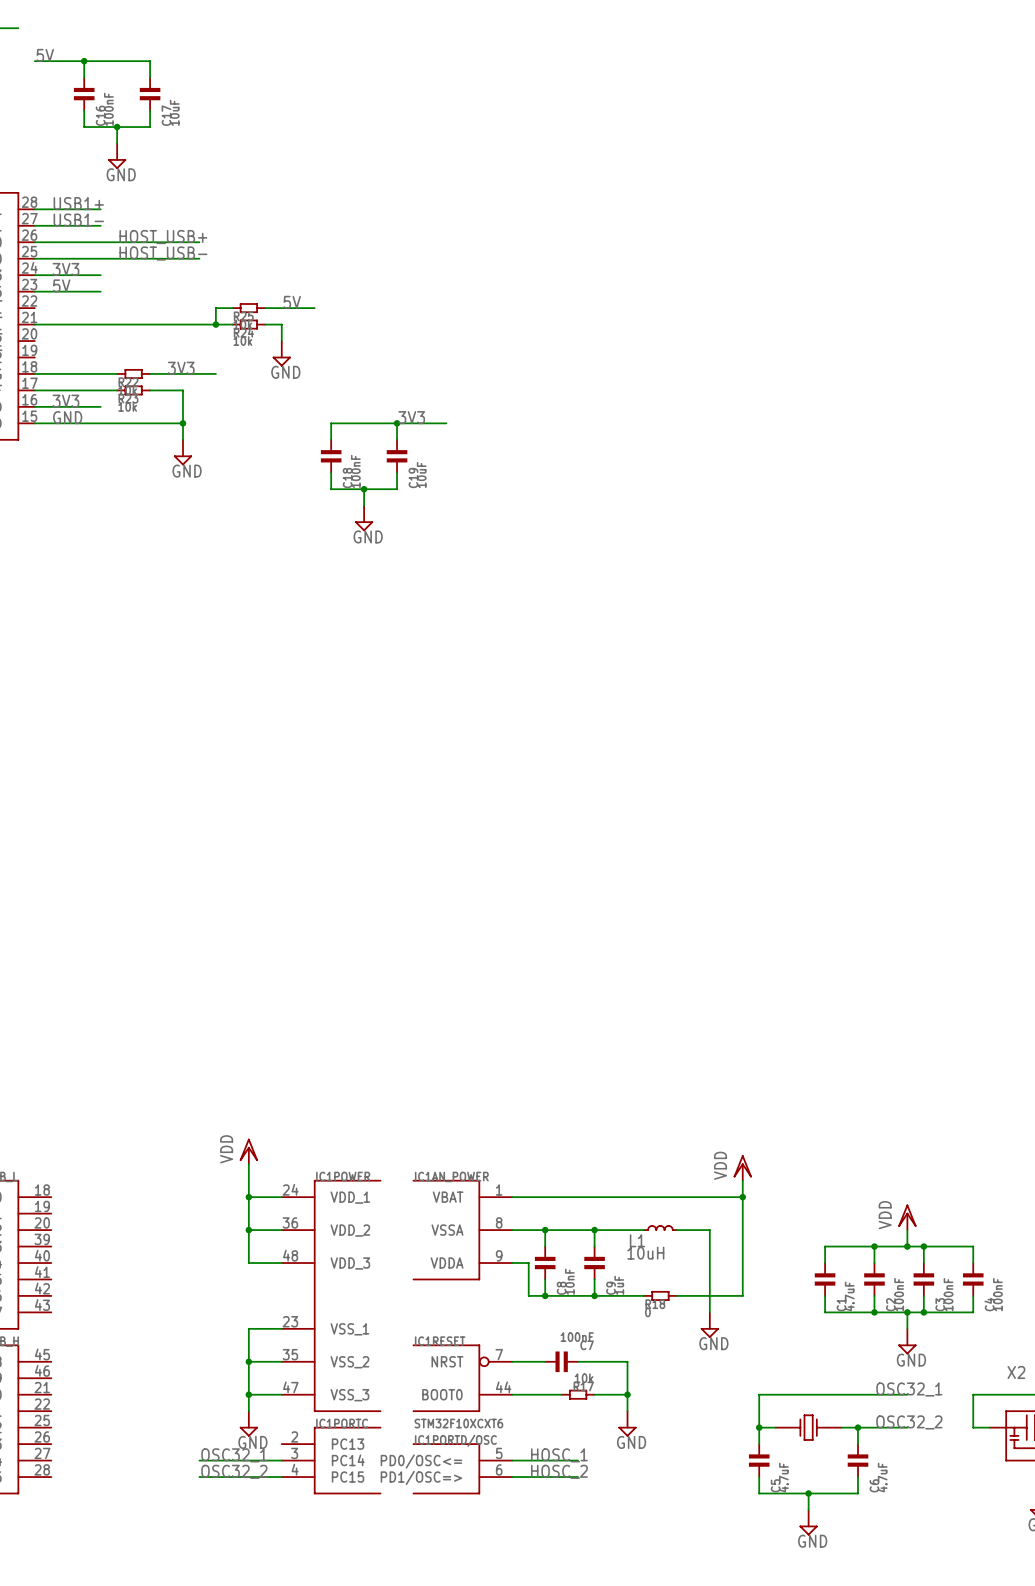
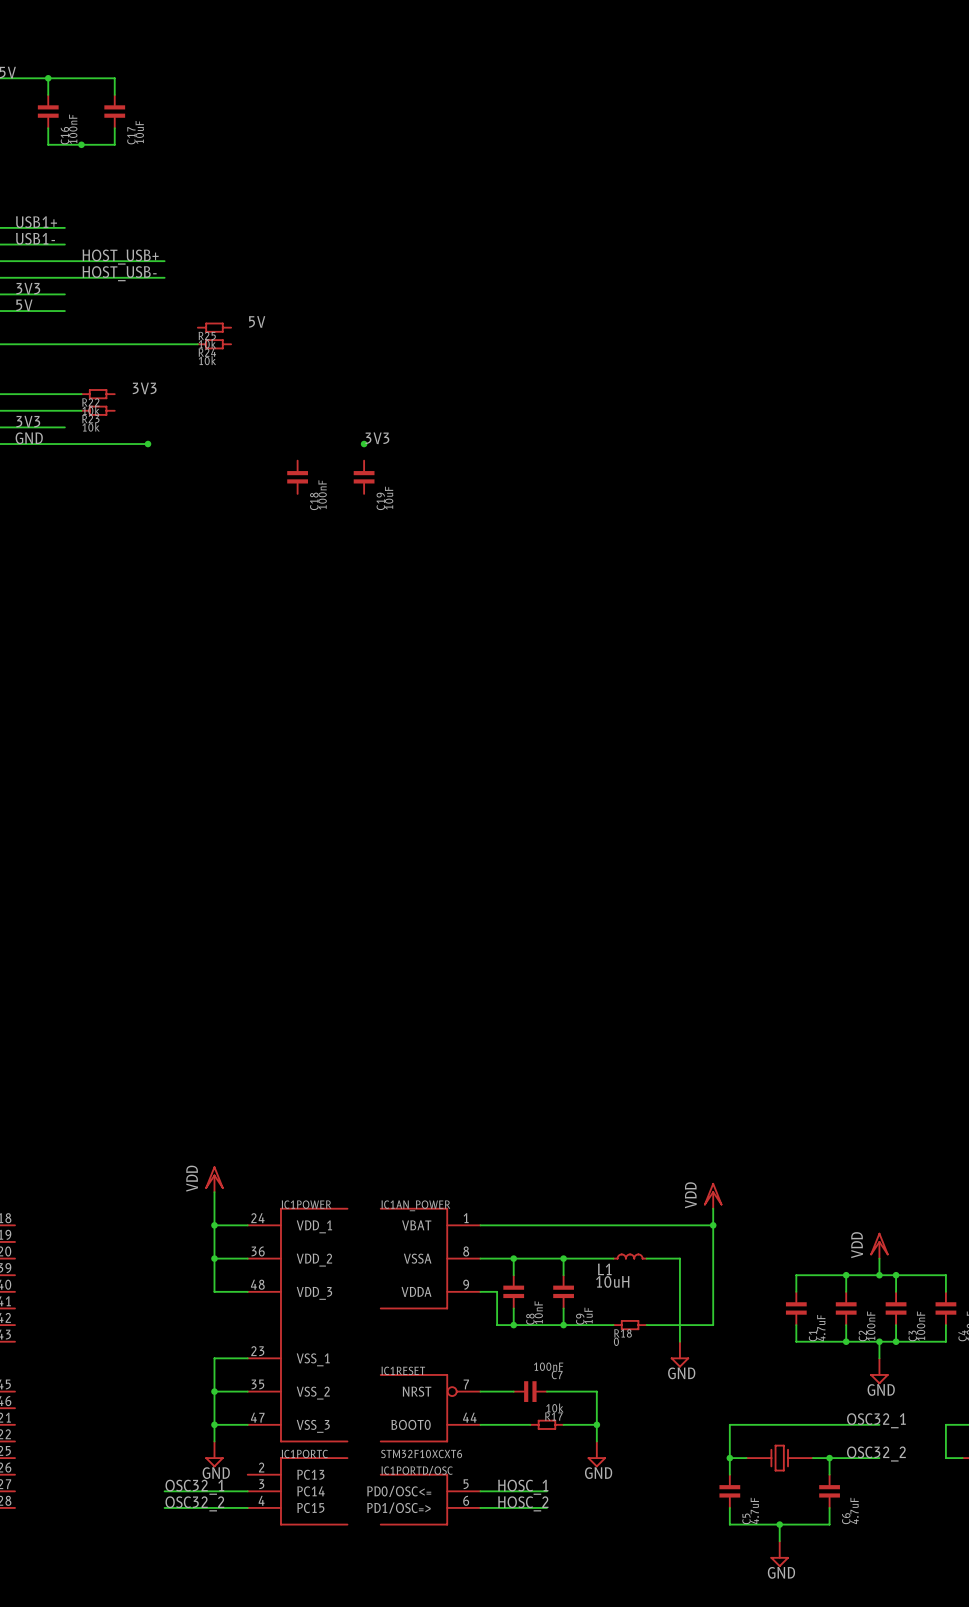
wire: (117, 127) (117, 143) -> none
power symbol: GND (117, 156) -> none
wire: (232, 308) (215, 308) (215, 324) -> none
wire: (265, 308) (314, 308) -> none
junction: (215, 324) -> none
wire: (265, 324) (281, 324) (281, 341) -> none
power symbol: GND (281, 353) -> none
wire: (150, 373) (215, 373) -> none
wire: (150, 390) (182, 390) (182, 439) -> none
wire: (397, 423) (397, 439) -> none
wire: (446, 423) (331, 423) (331, 439) -> none
power symbol: GND (182, 452) -> none
wire: (331, 472) (331, 489) (397, 489) (397, 472) -> none
wire: (364, 489) (364, 505) -> none
junction: (364, 489) -> none
power symbol: GND (364, 518) -> none

